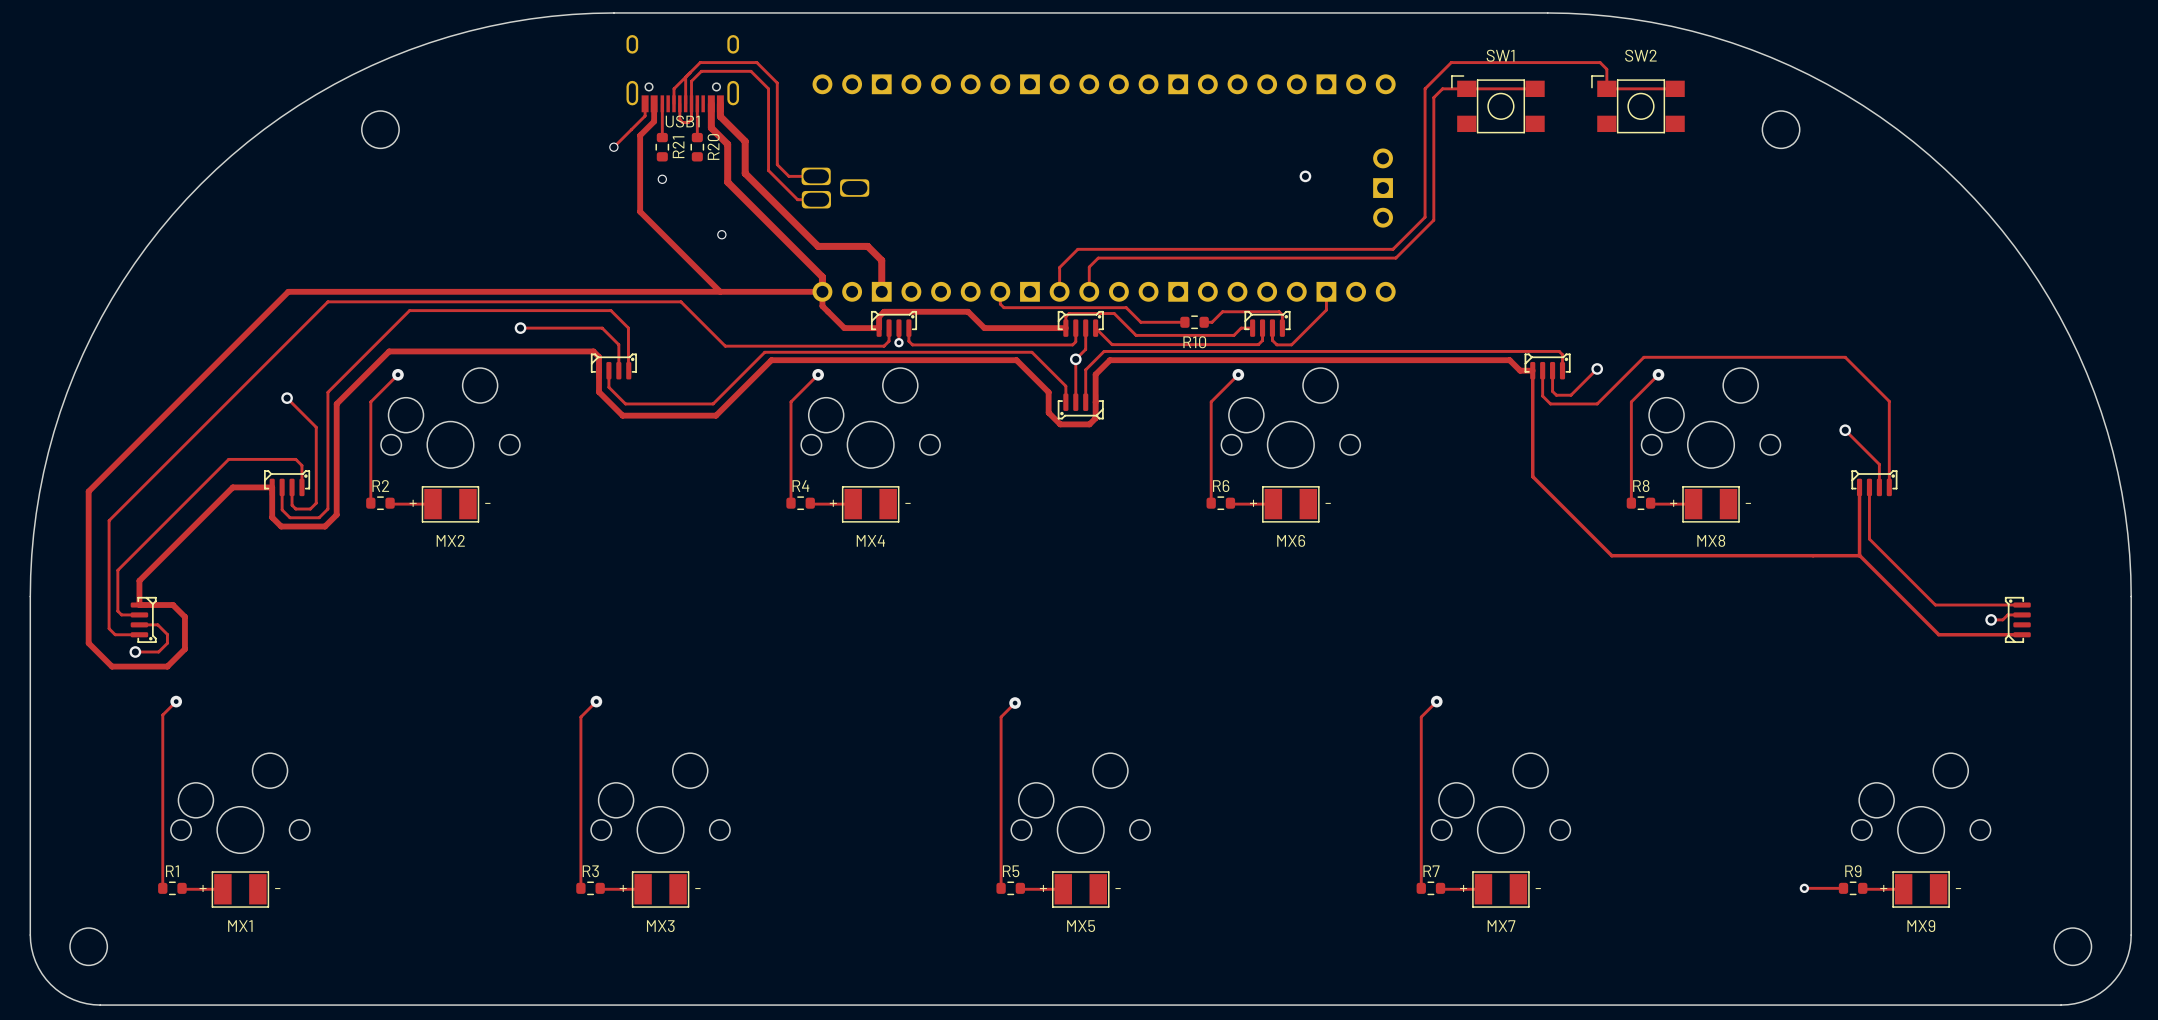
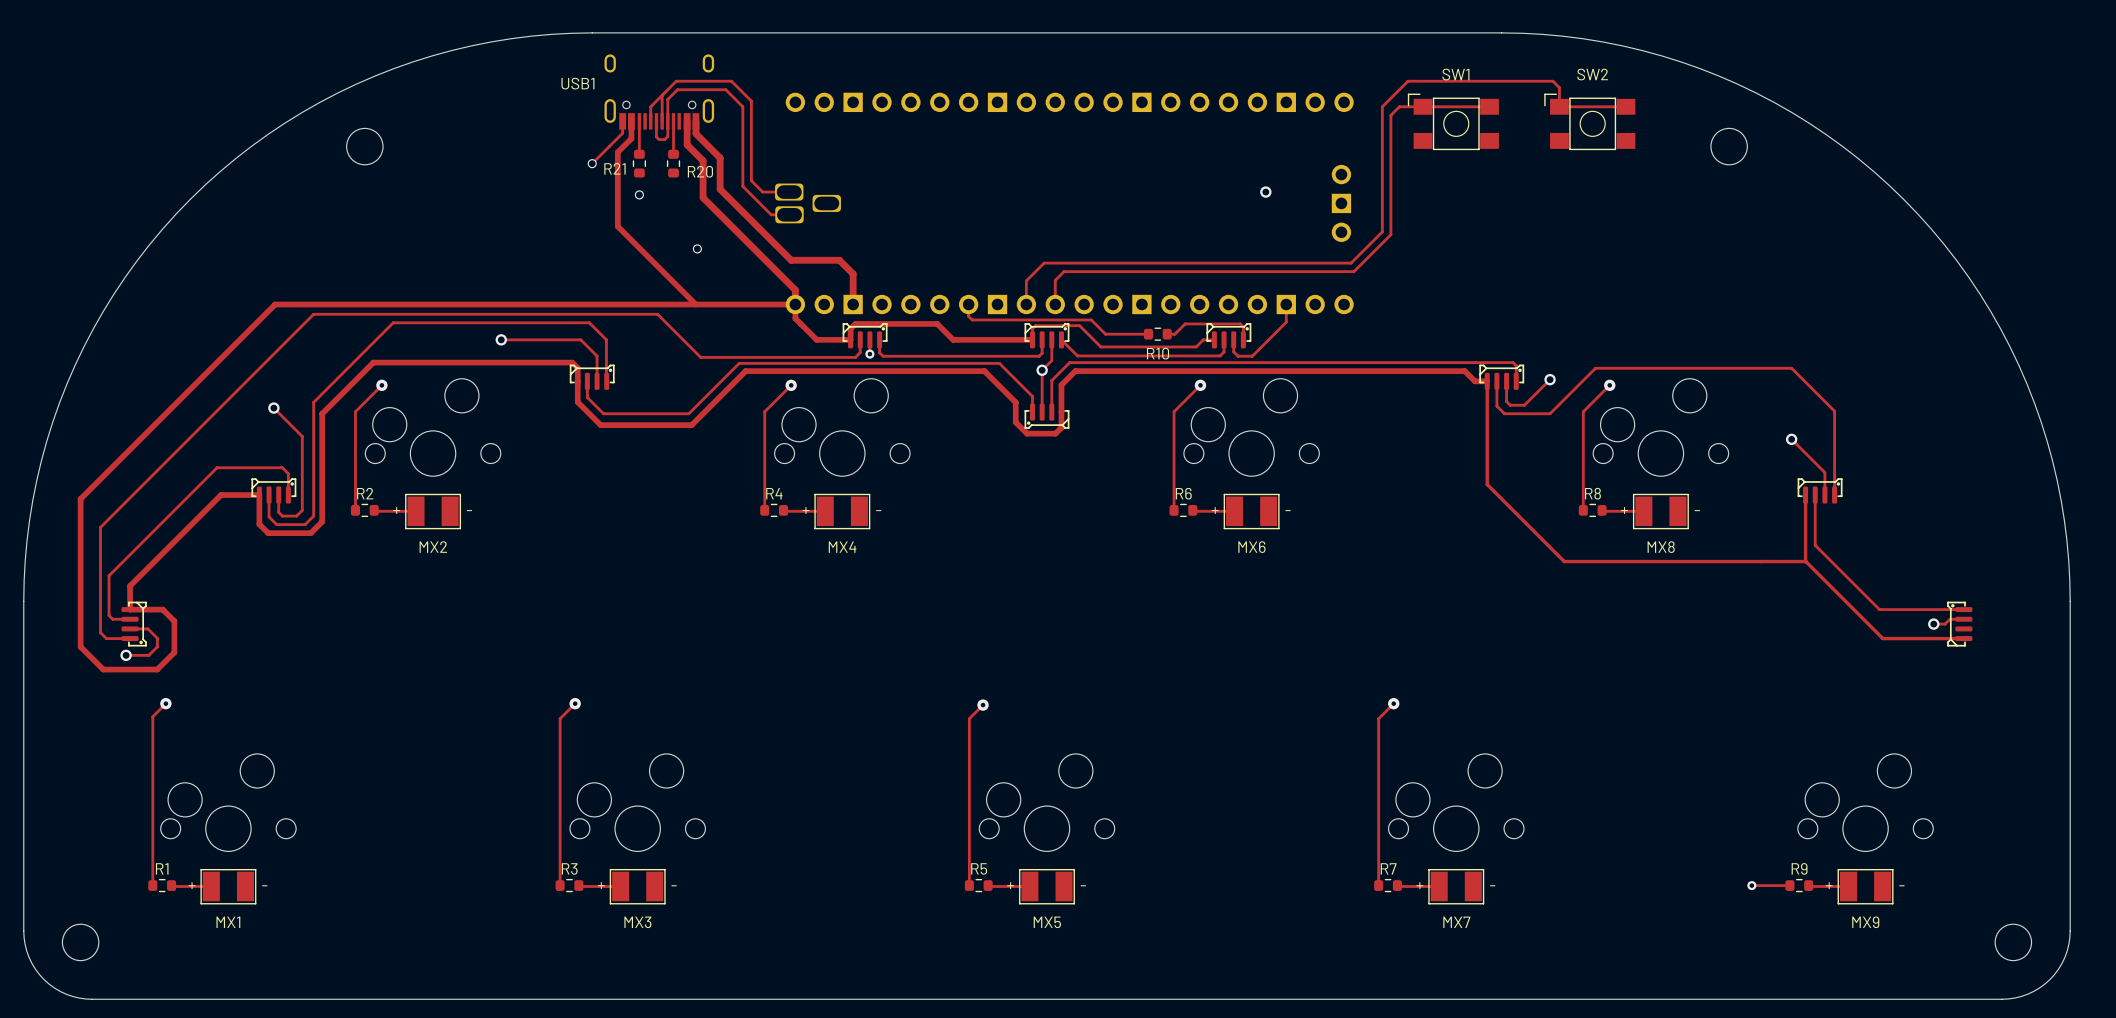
USB1 name position: USB1 (682, 121) -> USB1 (577, 83)
R21 name rotation: 0° (678, 147) -> 90° clockwise (614, 168)
R21 name position: R21 (678, 147) -> R21 (614, 168)
R20 name rotation: 0° (713, 147) -> 90° clockwise (700, 171)

